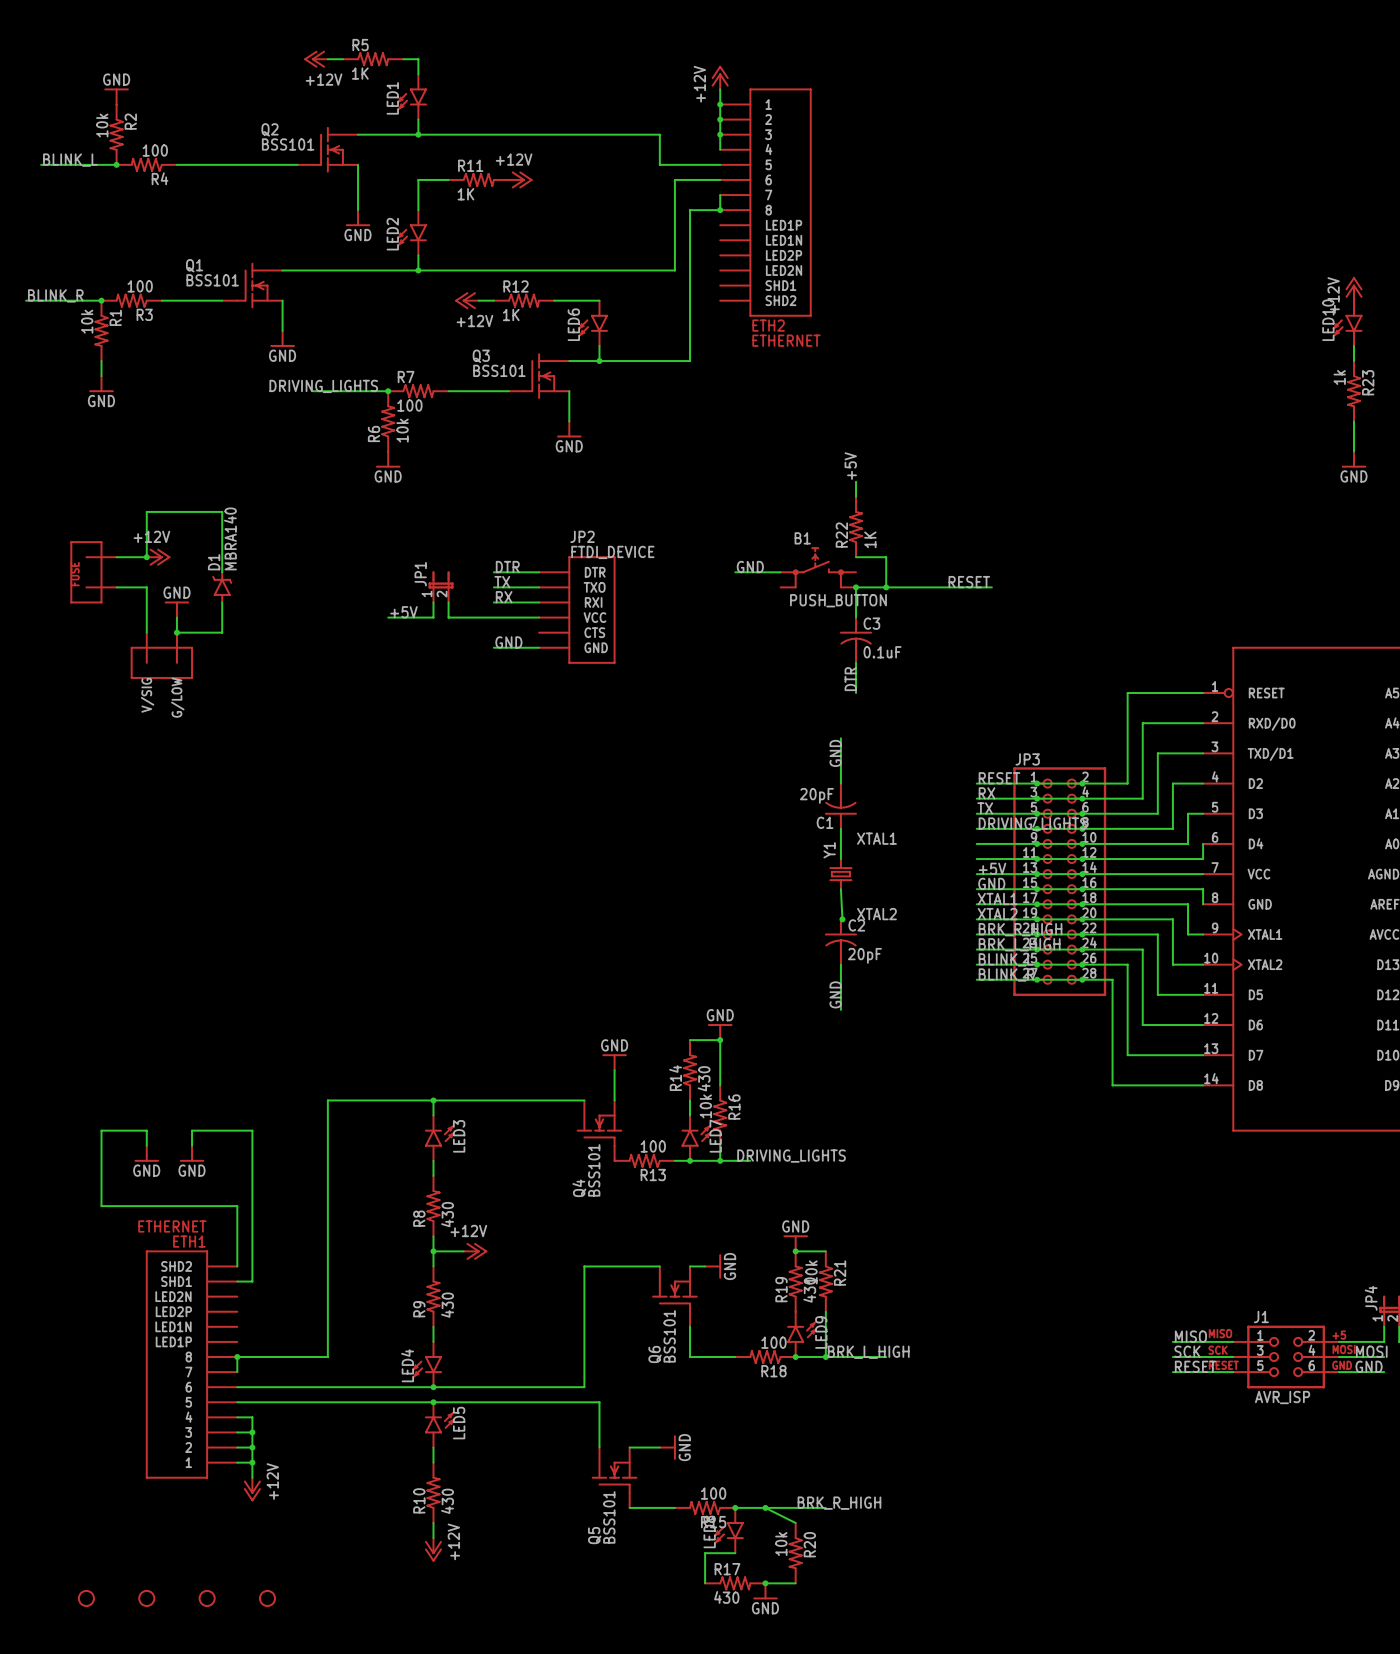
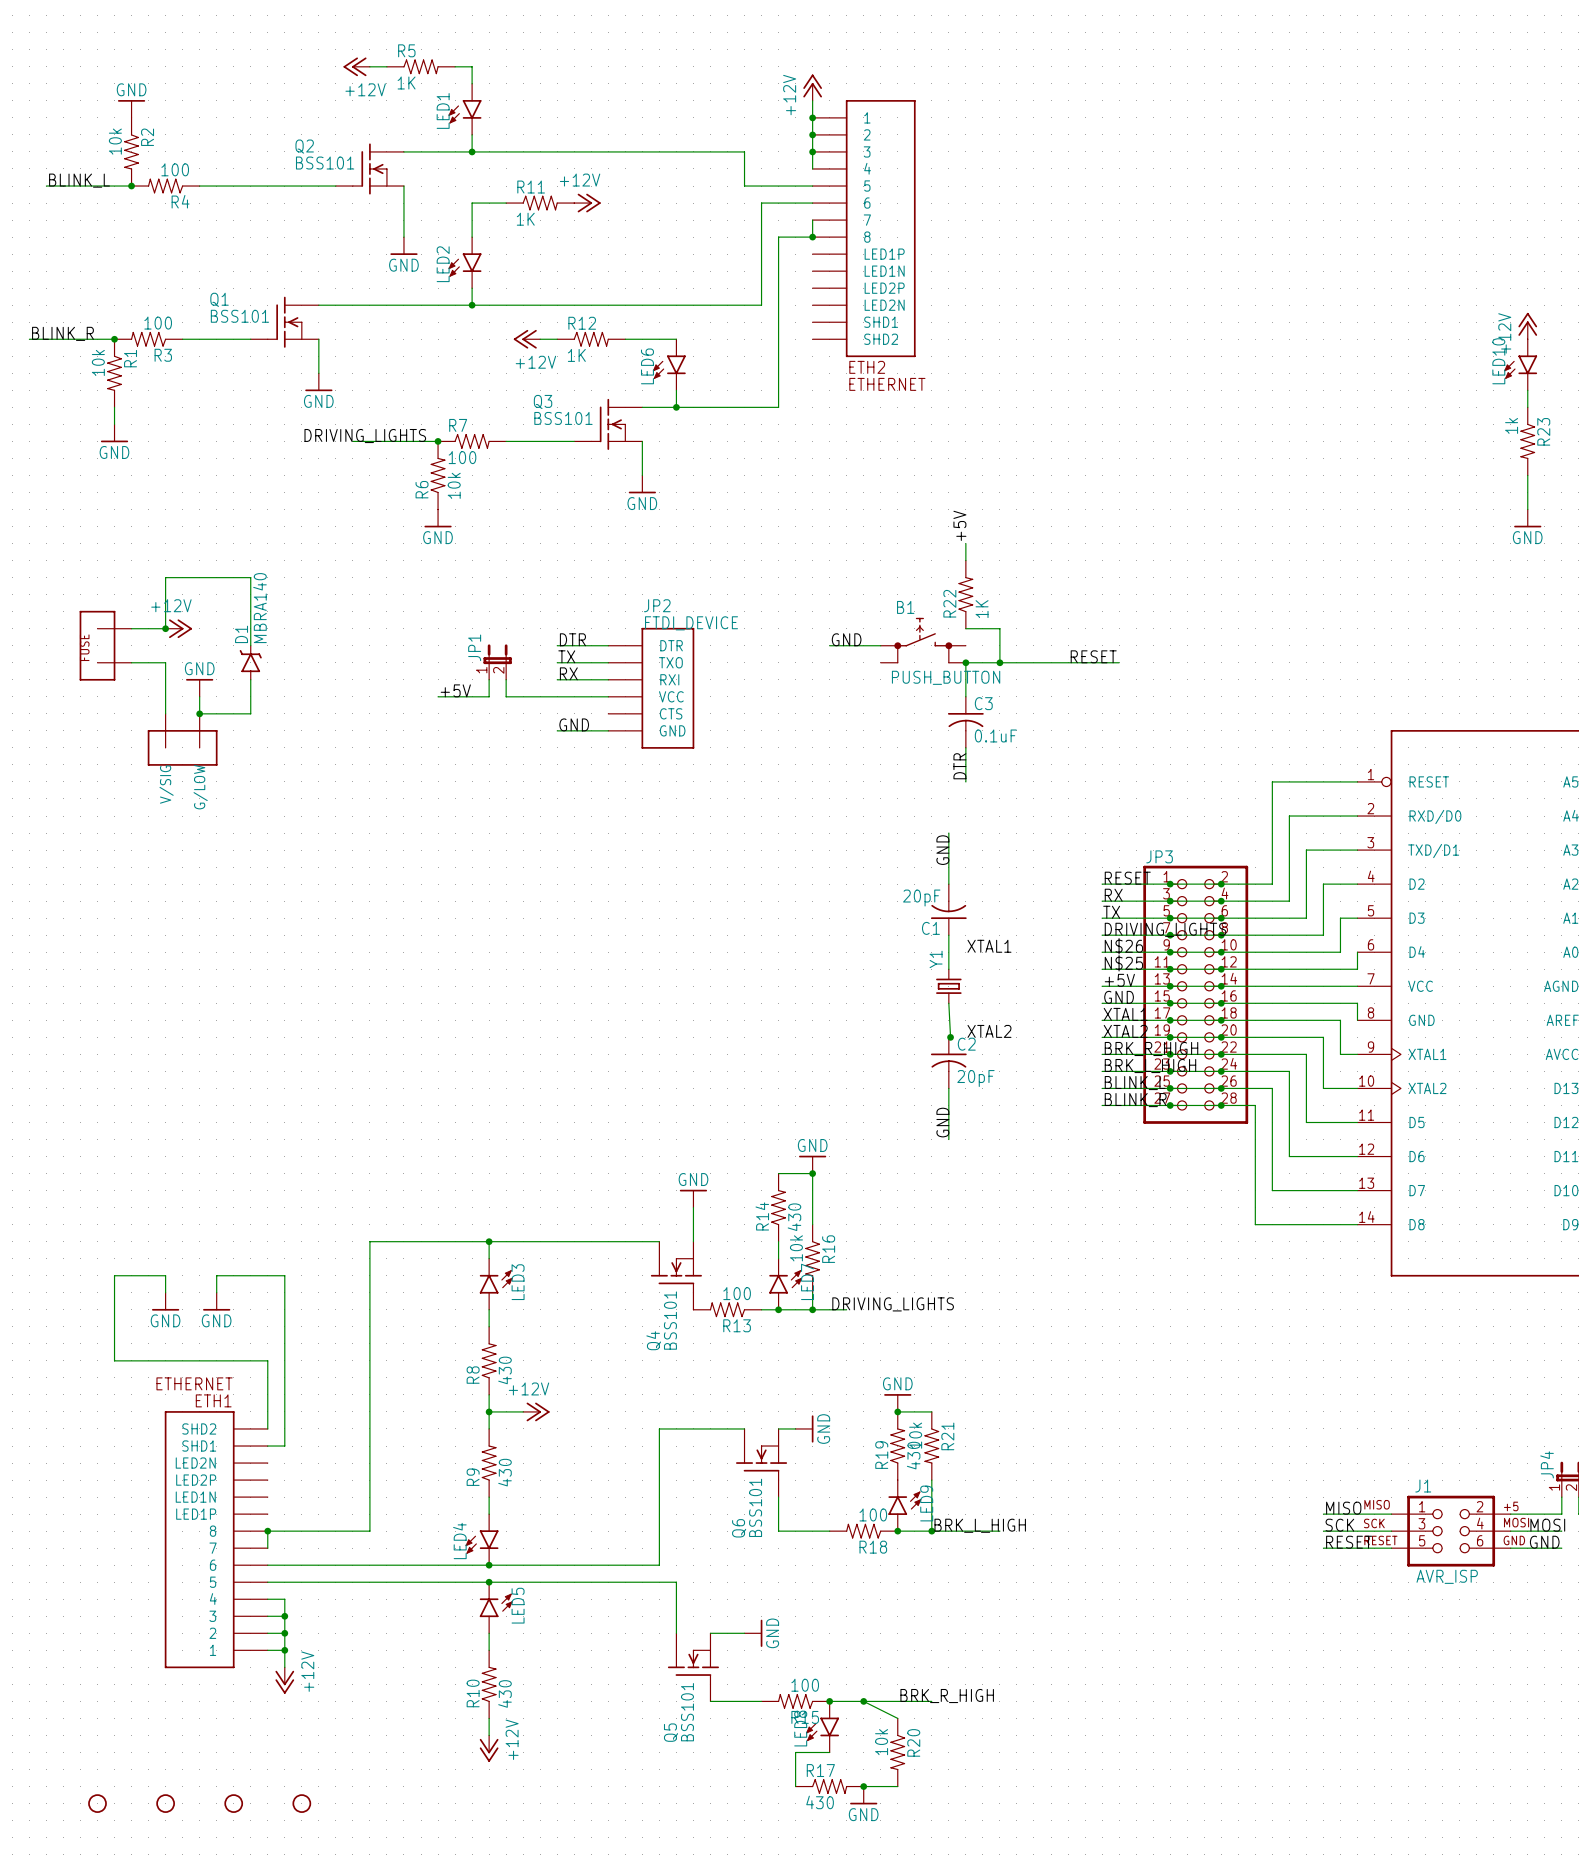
label: none -> N$26 (1123, 946)
label: none -> N$25 (1123, 963)

